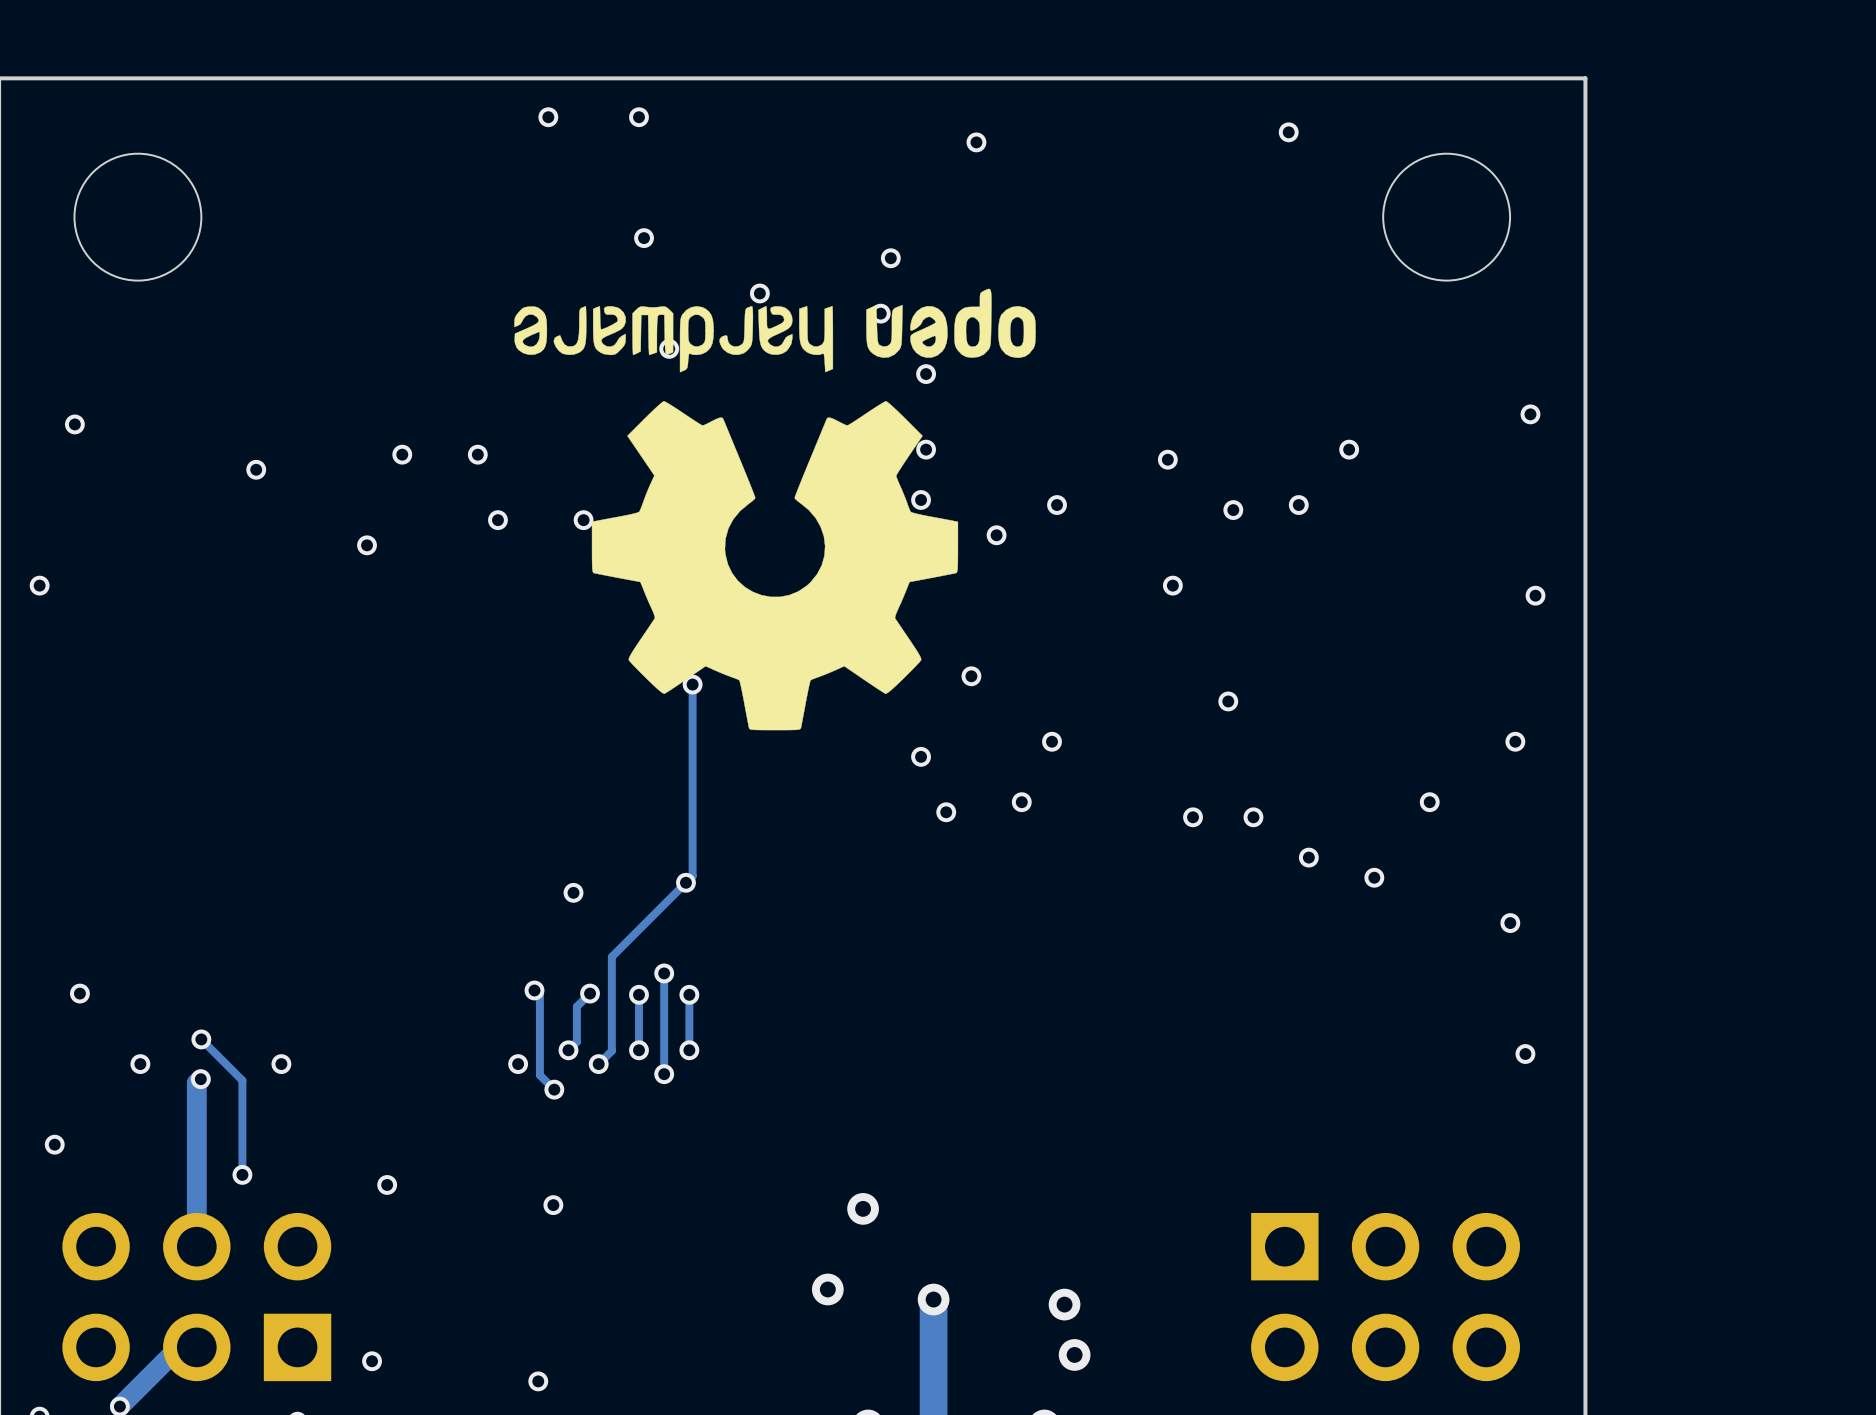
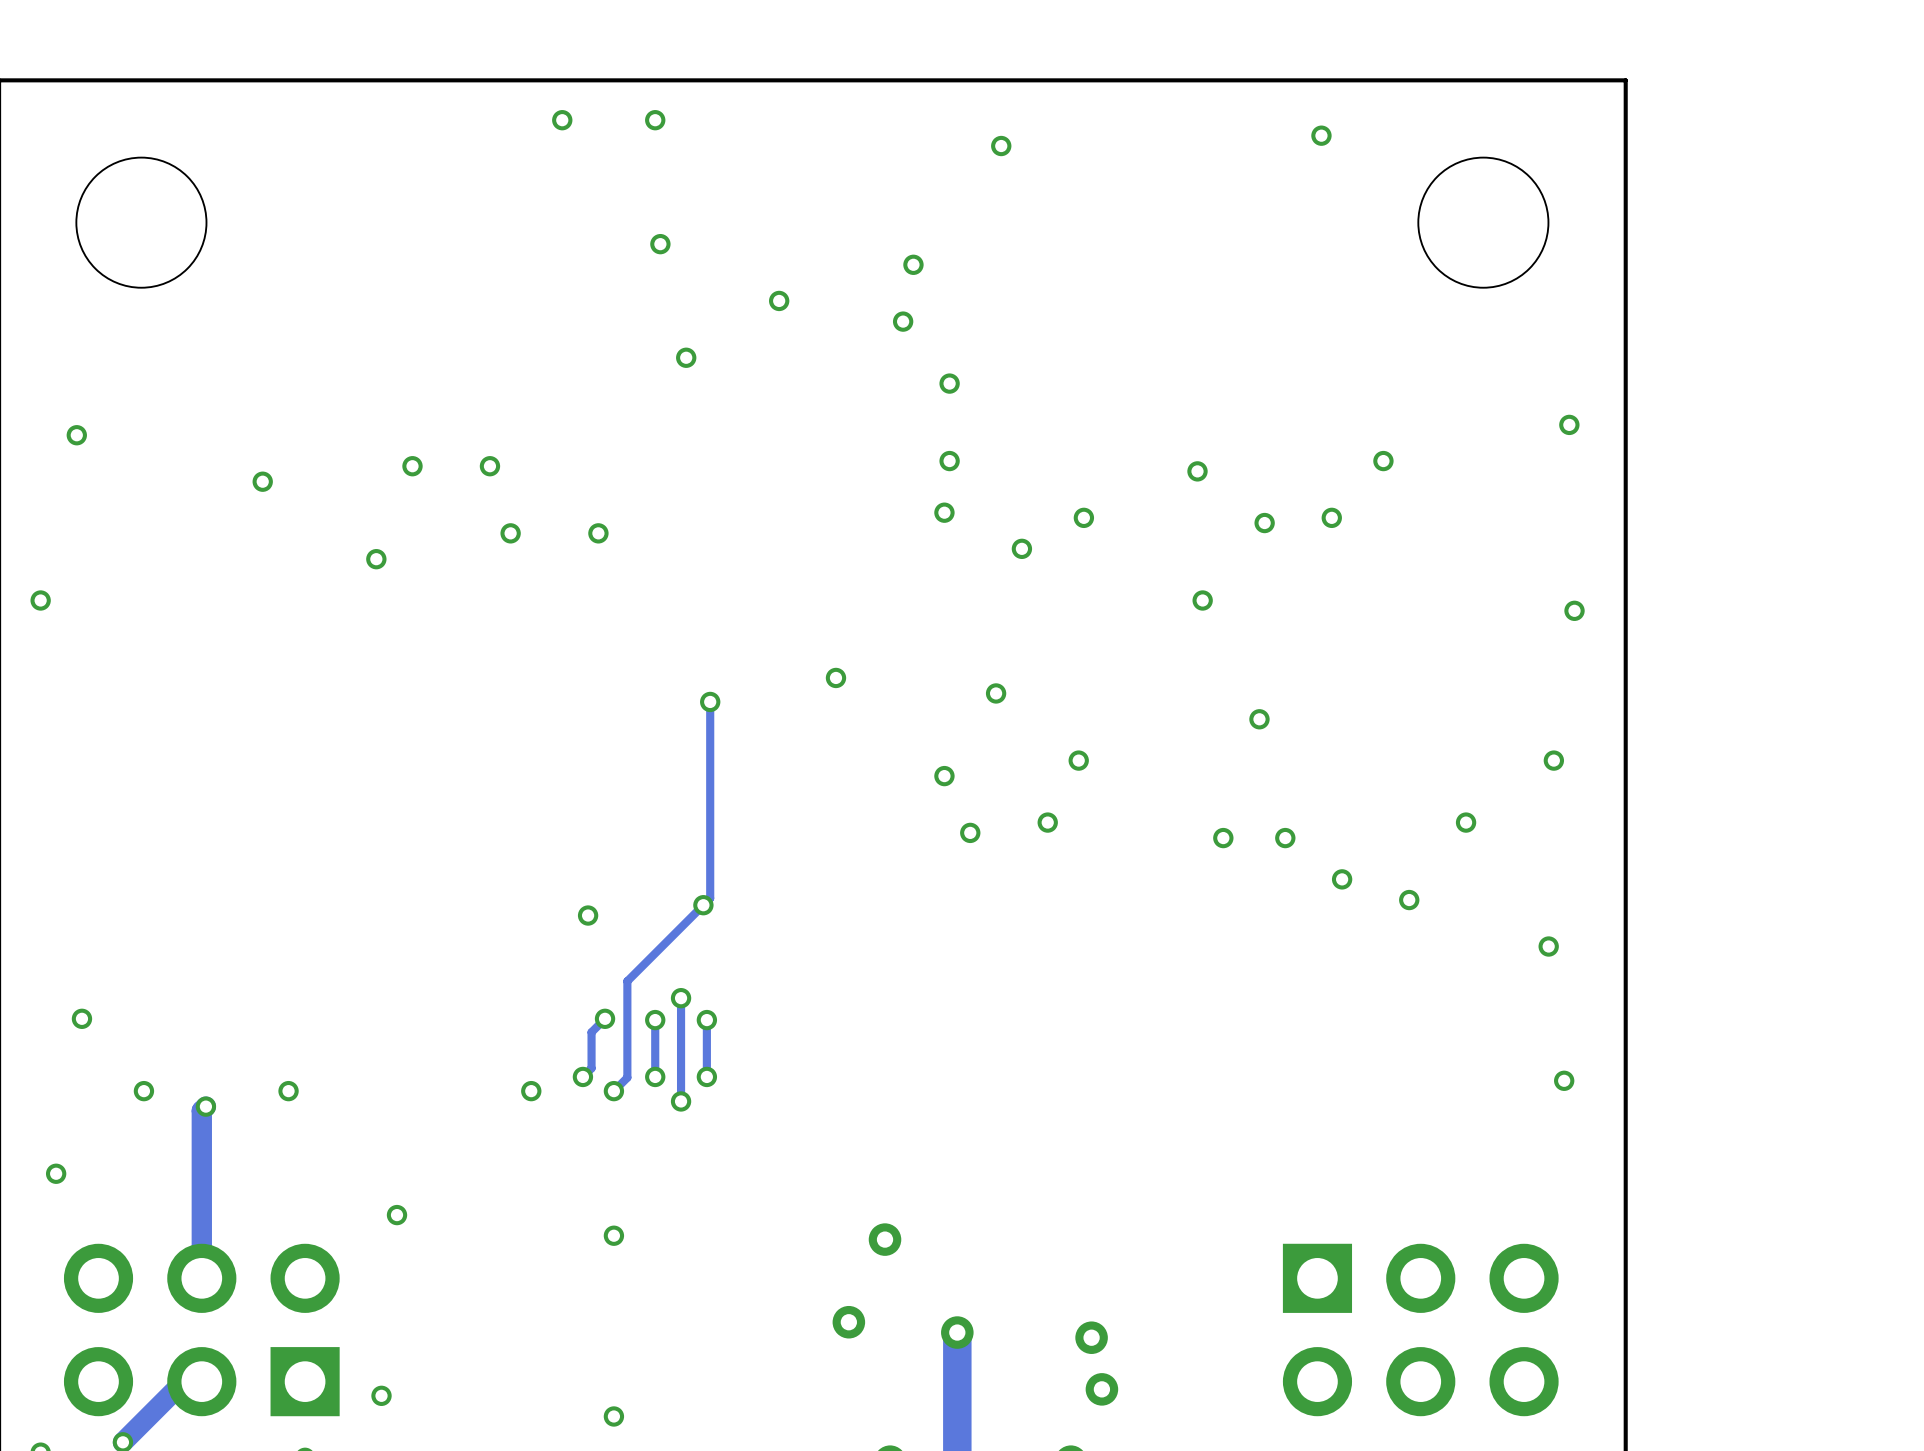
drawing: [514, 288, 1036, 731] -> none
track: (534, 990) (539, 995) (539, 1075) (554, 1089) -> none
via: (534, 990) -> none
track: (201, 1039) (242, 1080) (242, 1174) -> none
via: (201, 1039) -> none
via: (554, 1089) -> none
via: (242, 1174) -> none
via position: (553, 1205) -> (613, 1235)
via: (538, 1381) -> none
via: none -> (613, 1416)

